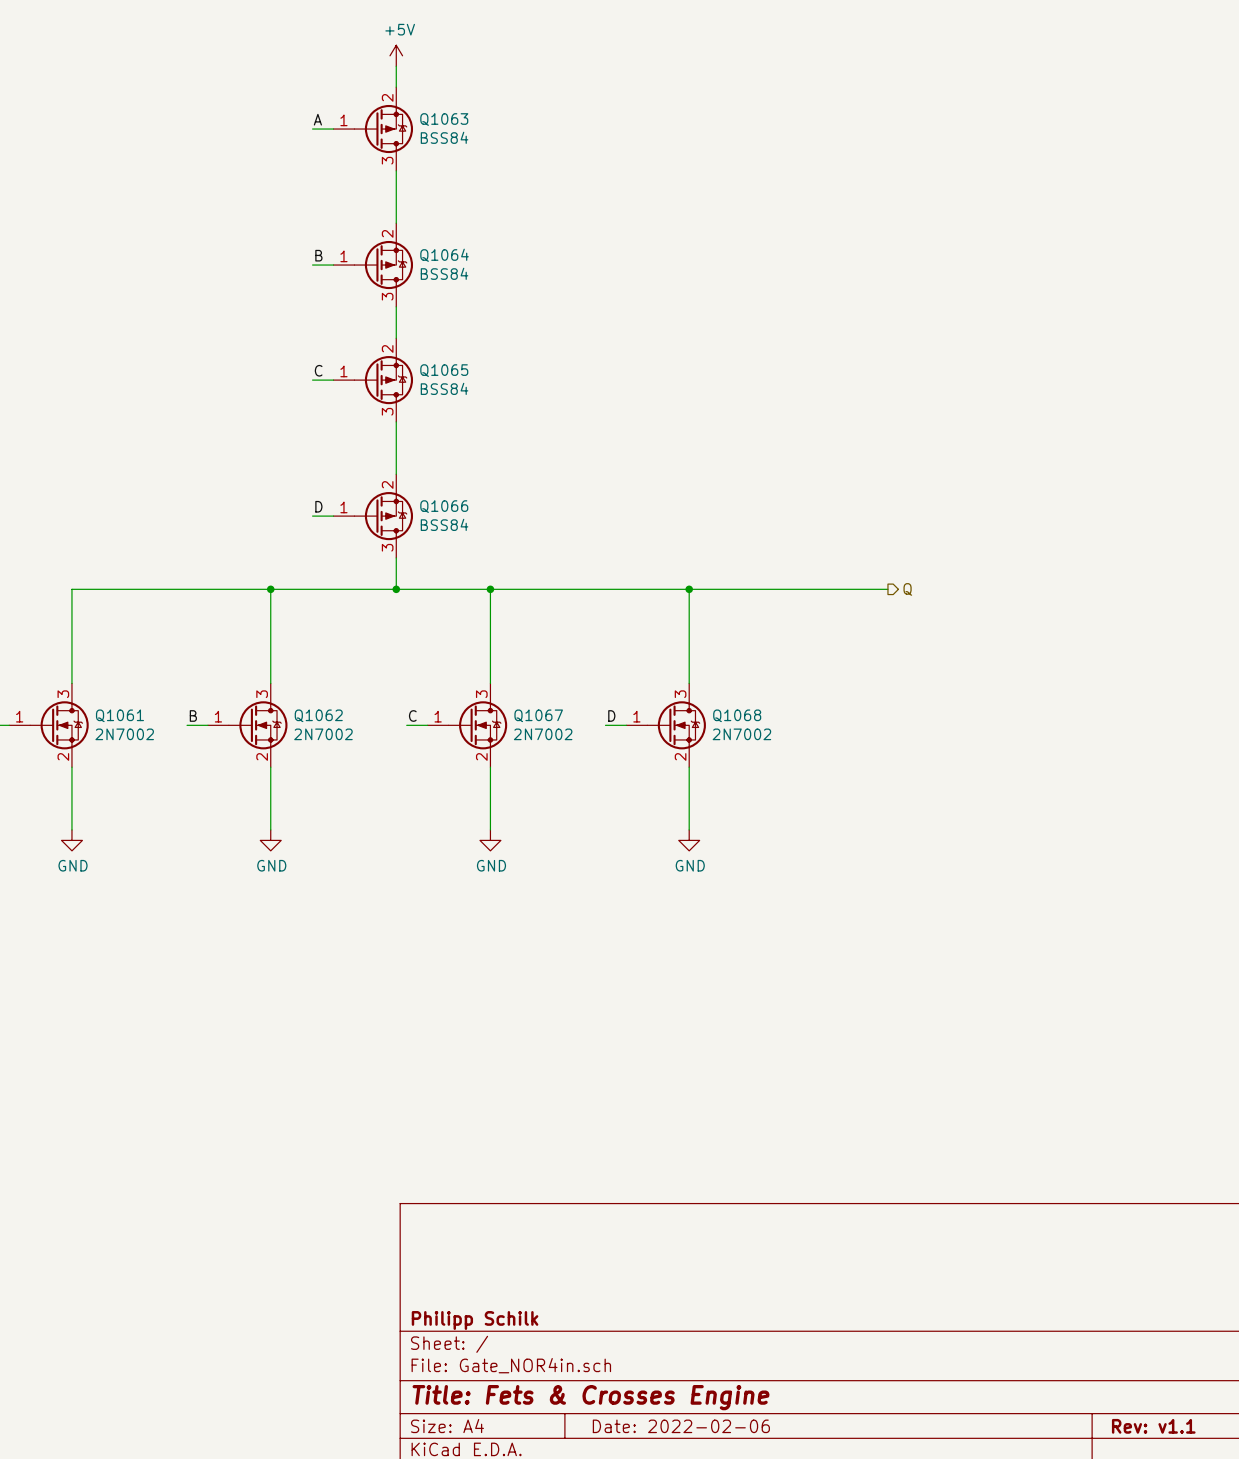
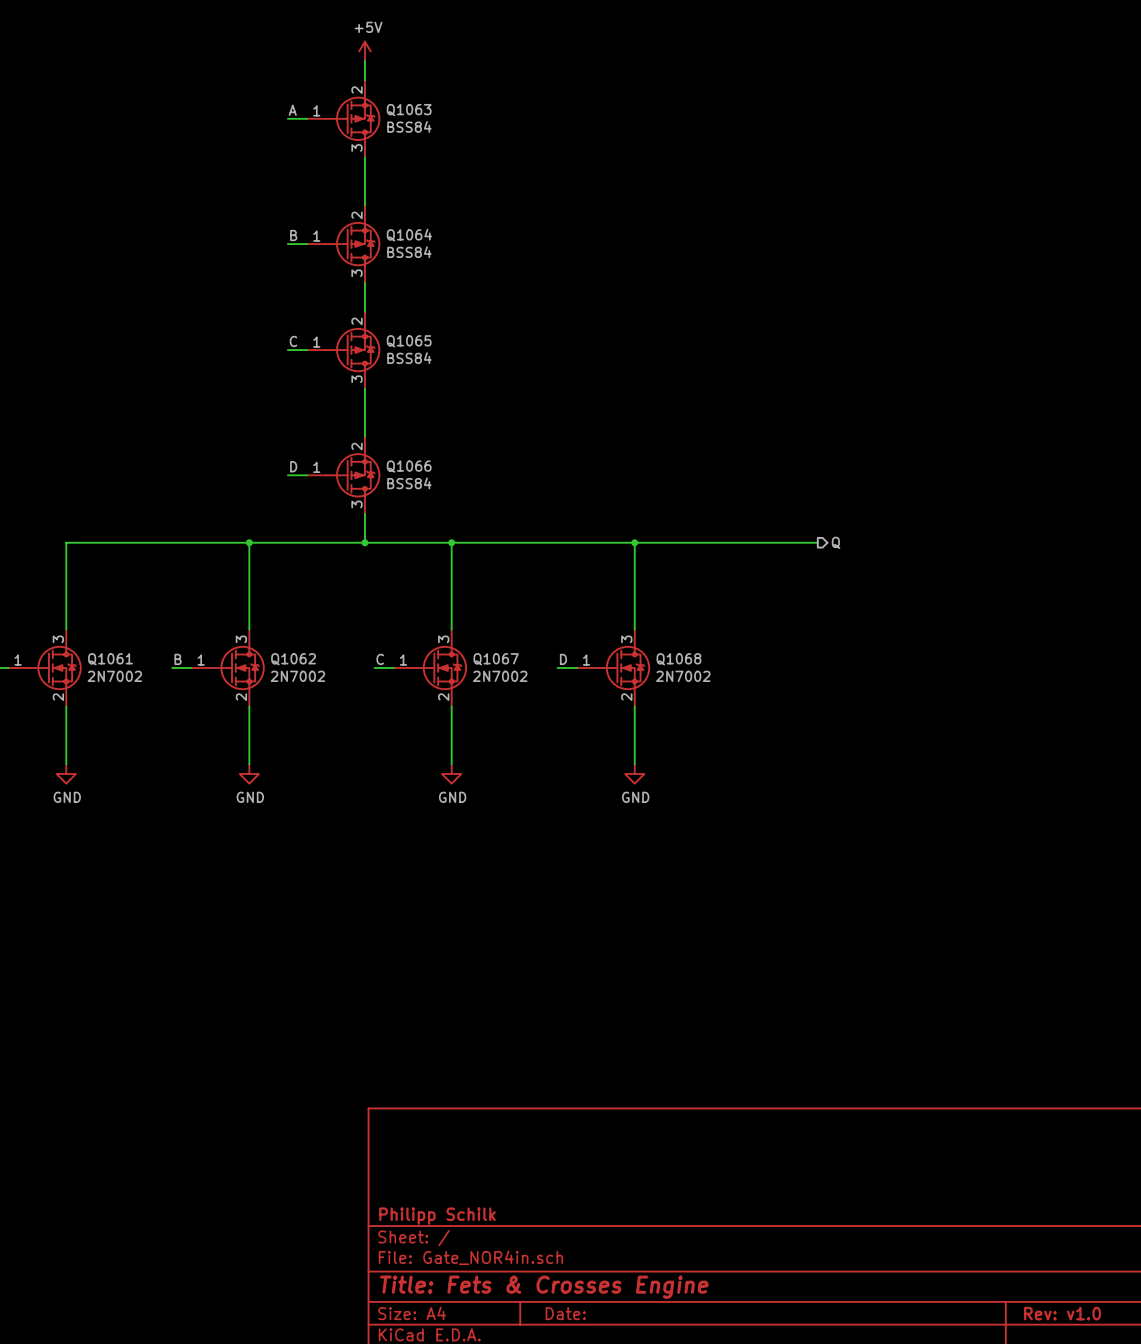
title block: Date: 2022-02-06 (681, 1426) -> Date: (565, 1313)
title block: Rev: v1.1 (1153, 1426) -> Rev: v1.0 (1062, 1313)

